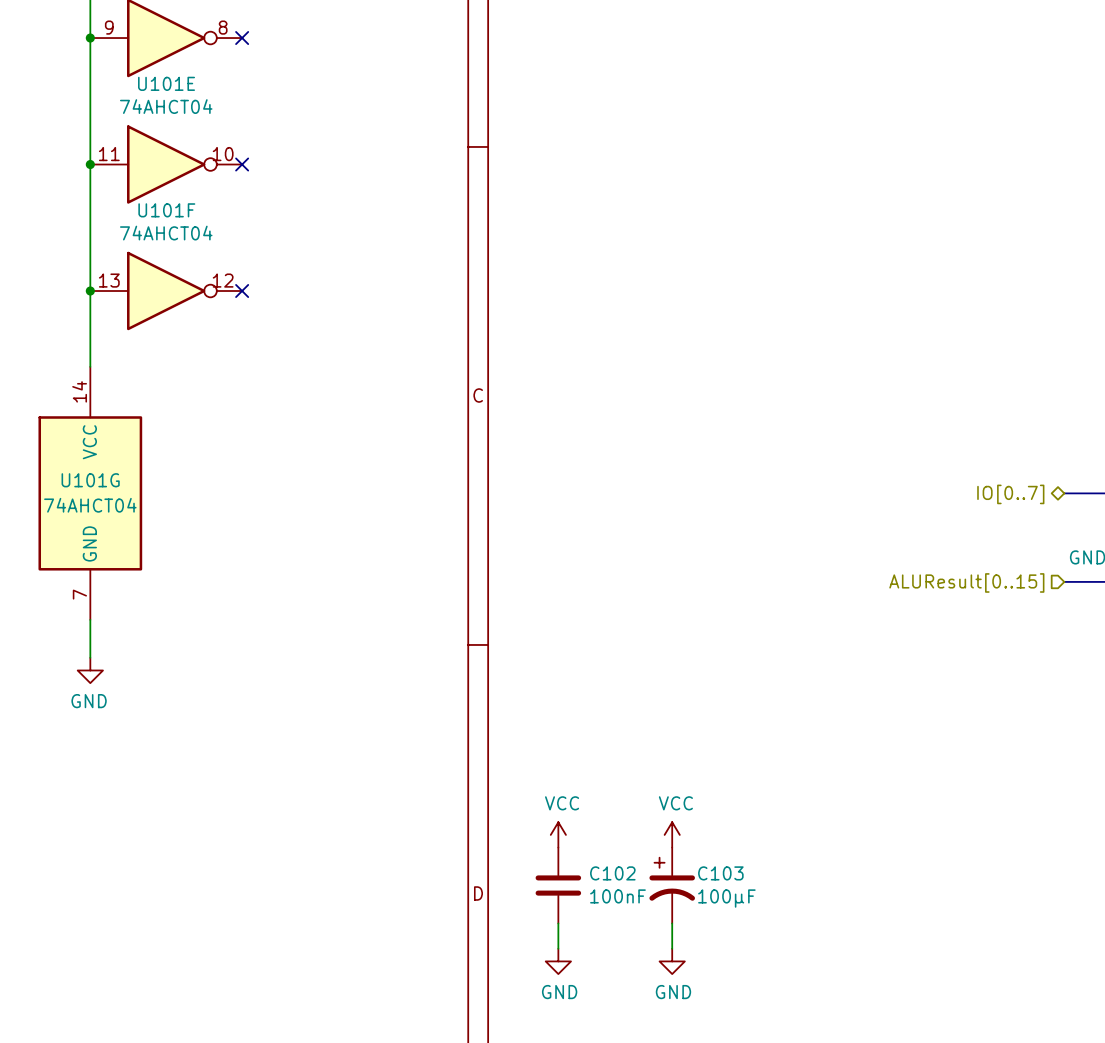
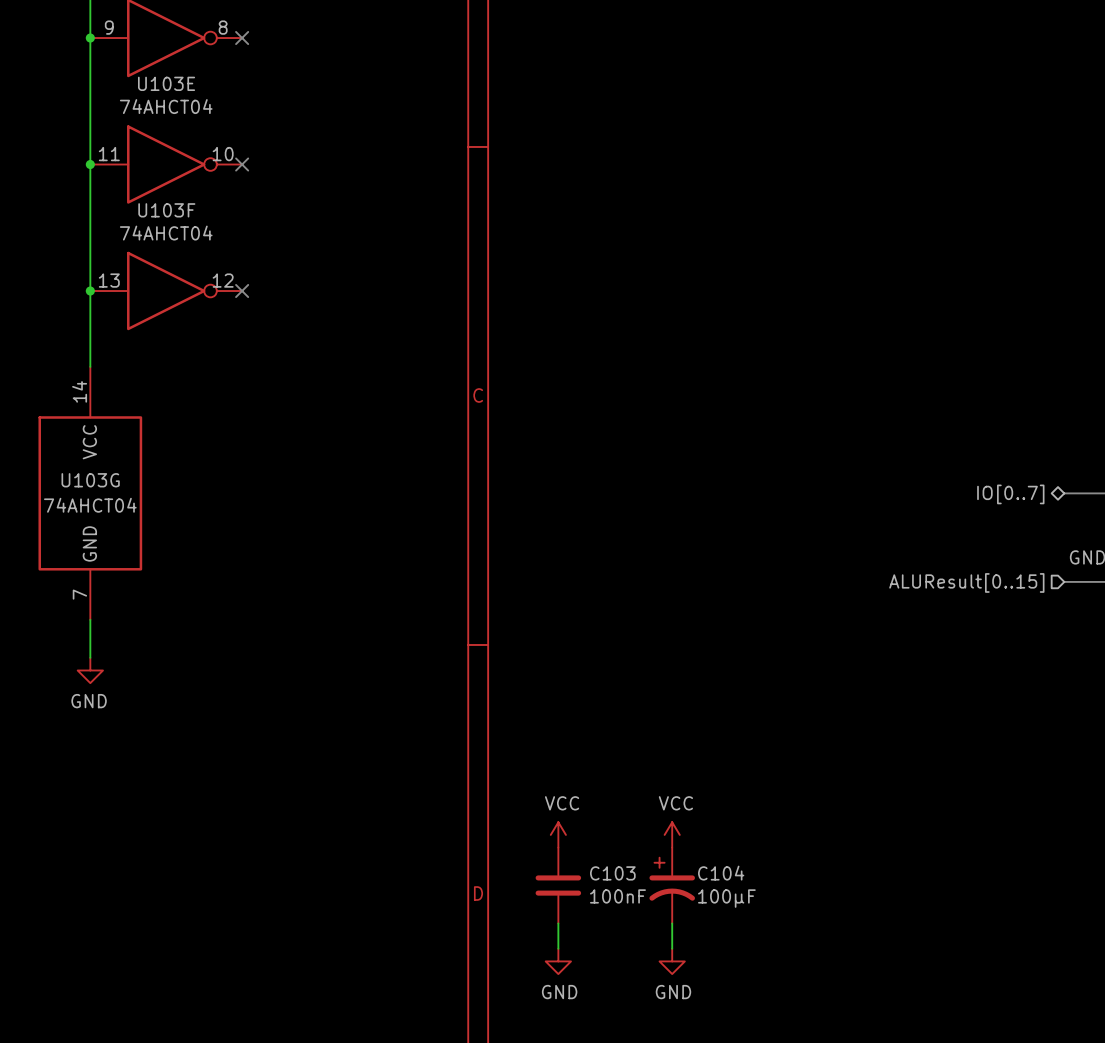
U101E name: U101E (166, 83) -> U103E (166, 83)
U101F name: U101F (166, 210) -> U103F (166, 210)
U101G name: U101G (90, 480) -> U103G (90, 480)
C102 name: C102 (612, 873) -> C103 (612, 873)
C103 name: C103 (720, 873) -> C104 (721, 873)

